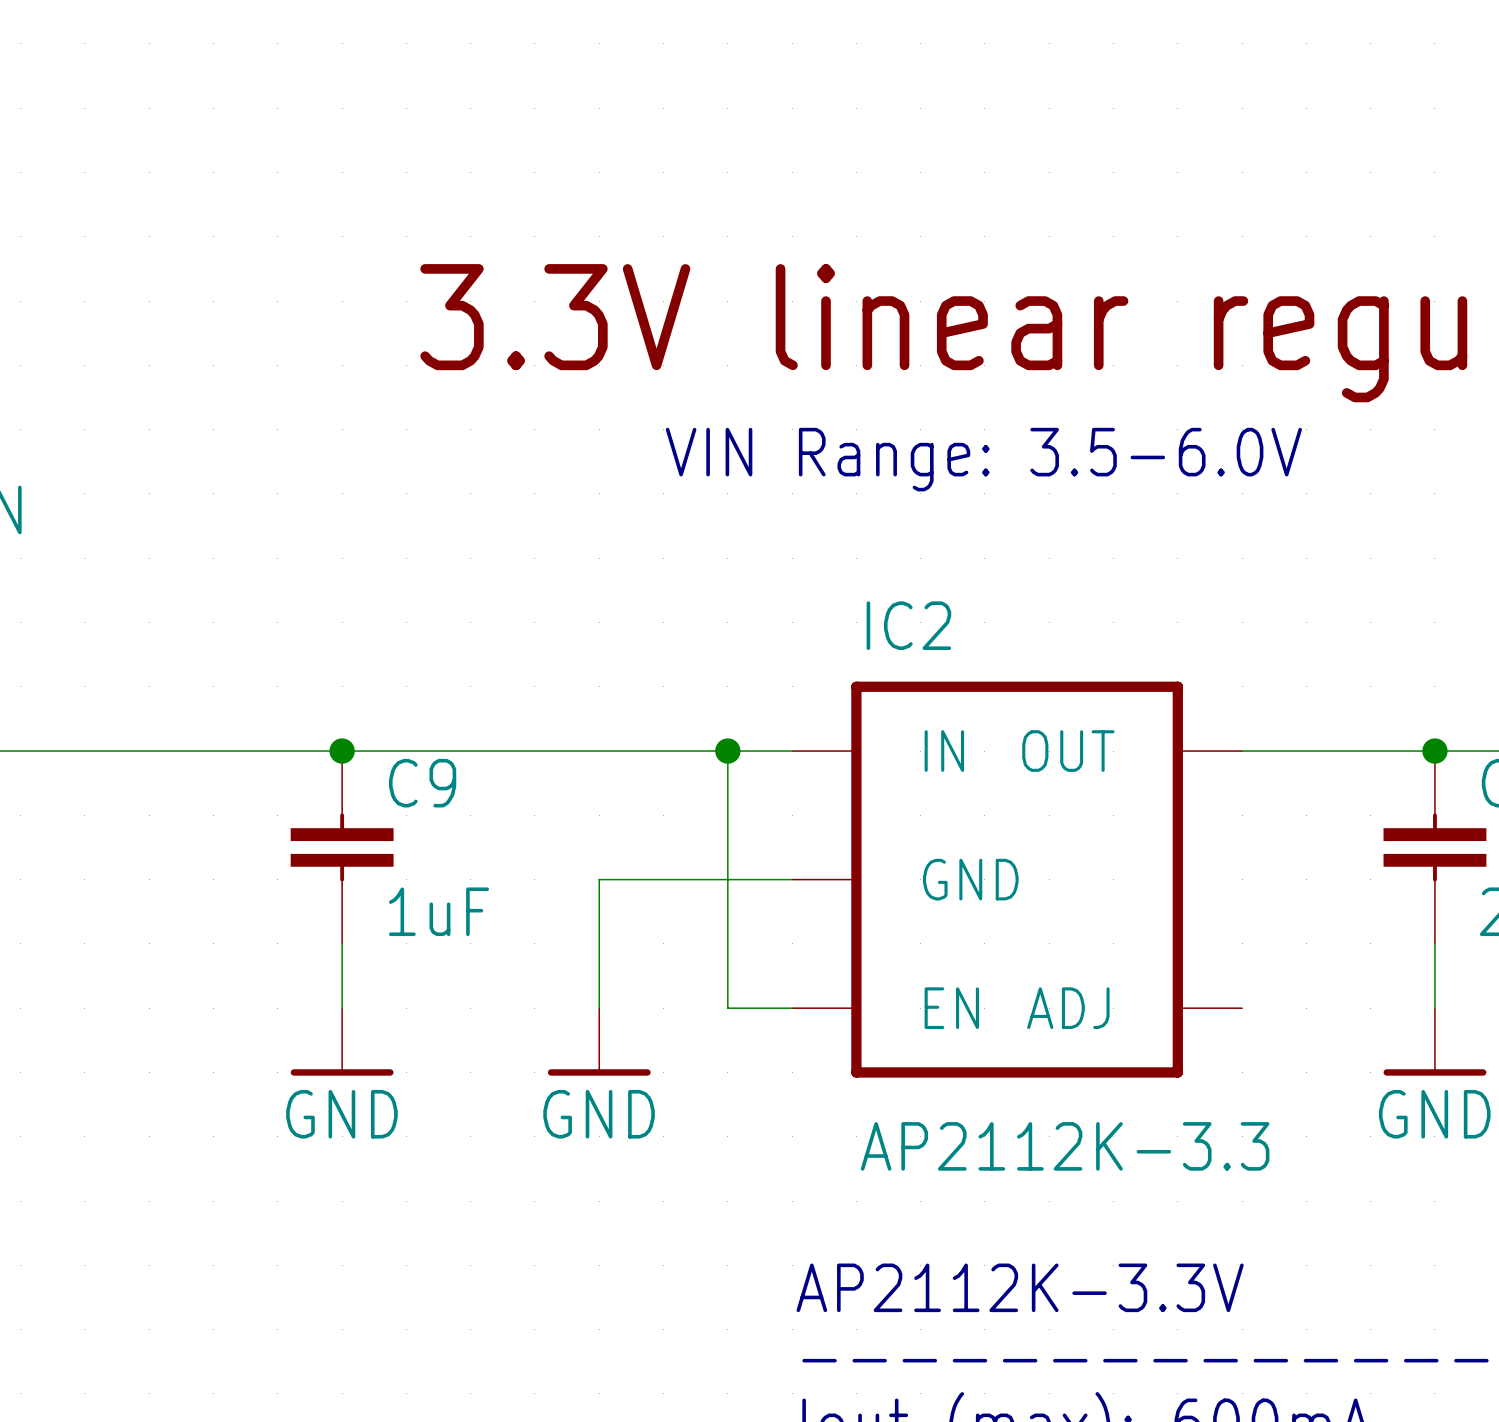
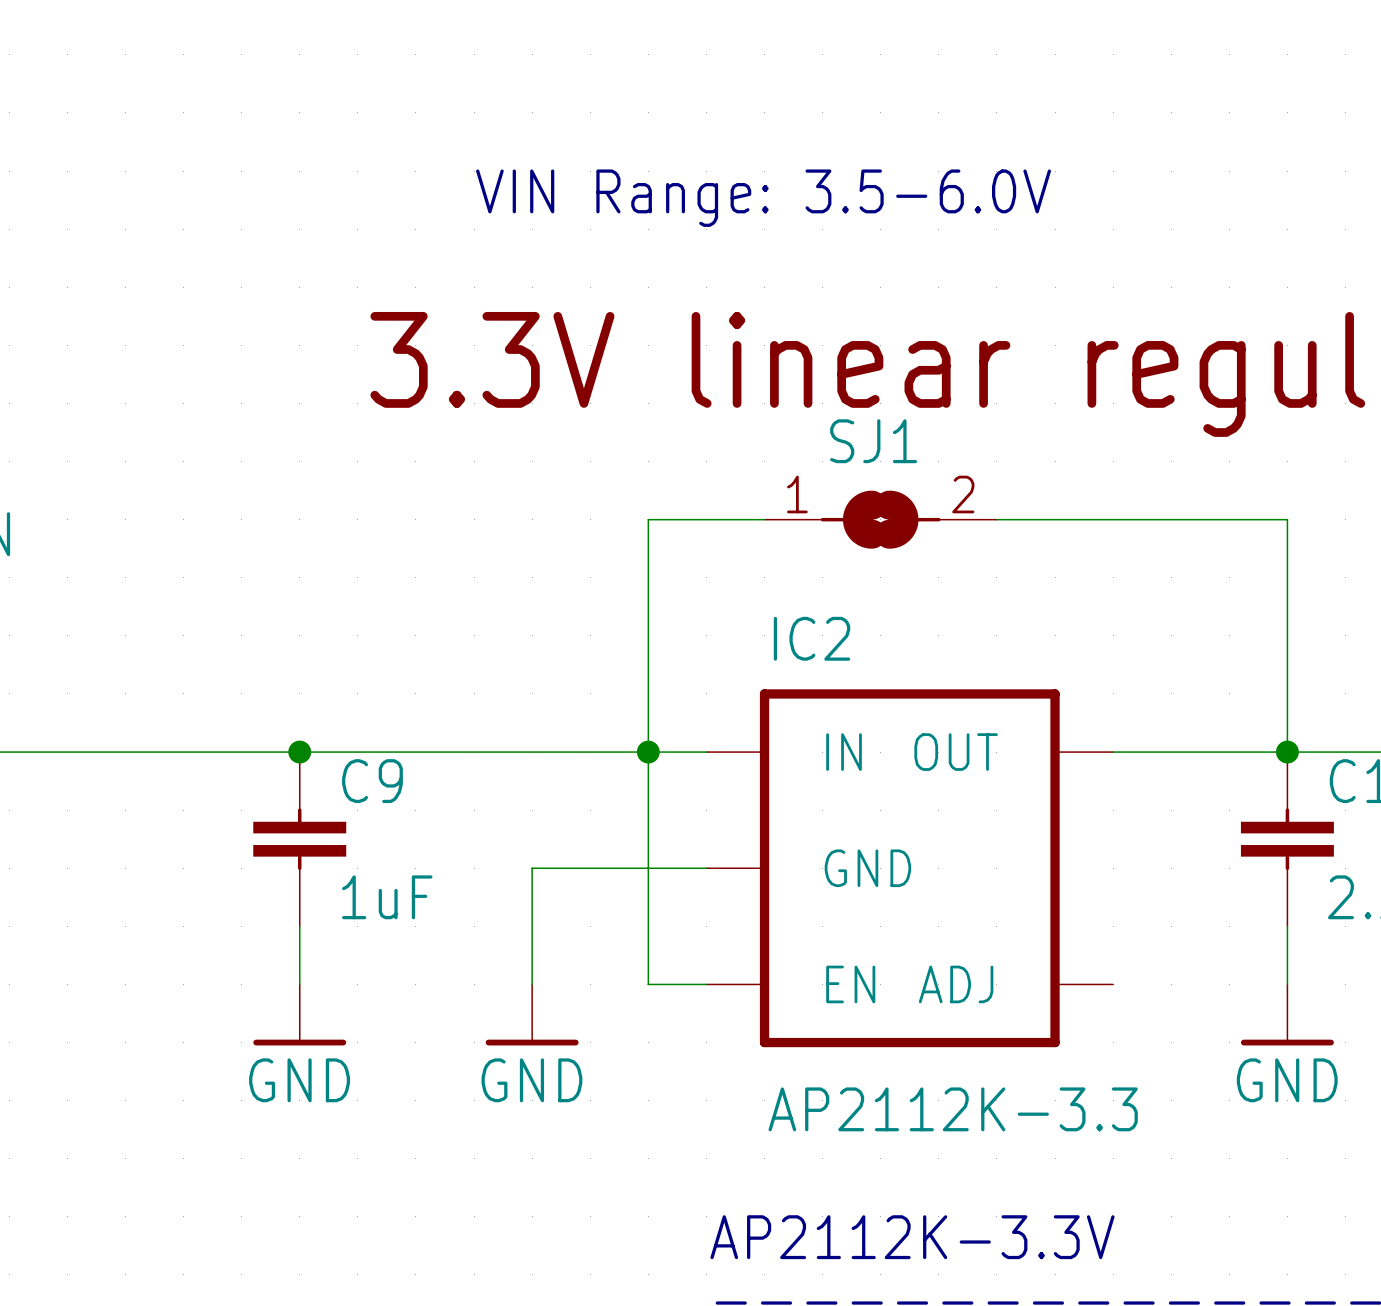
text position: VIN Range: 3.5-6.0V (983, 459) -> VIN Range: 3.5-6.0V (763, 198)
wire: none -> (764, 519) (648, 519) (648, 752)
SJ1: none -> (880, 519)
wire: none -> (996, 519) (1287, 519) (1287, 752)

